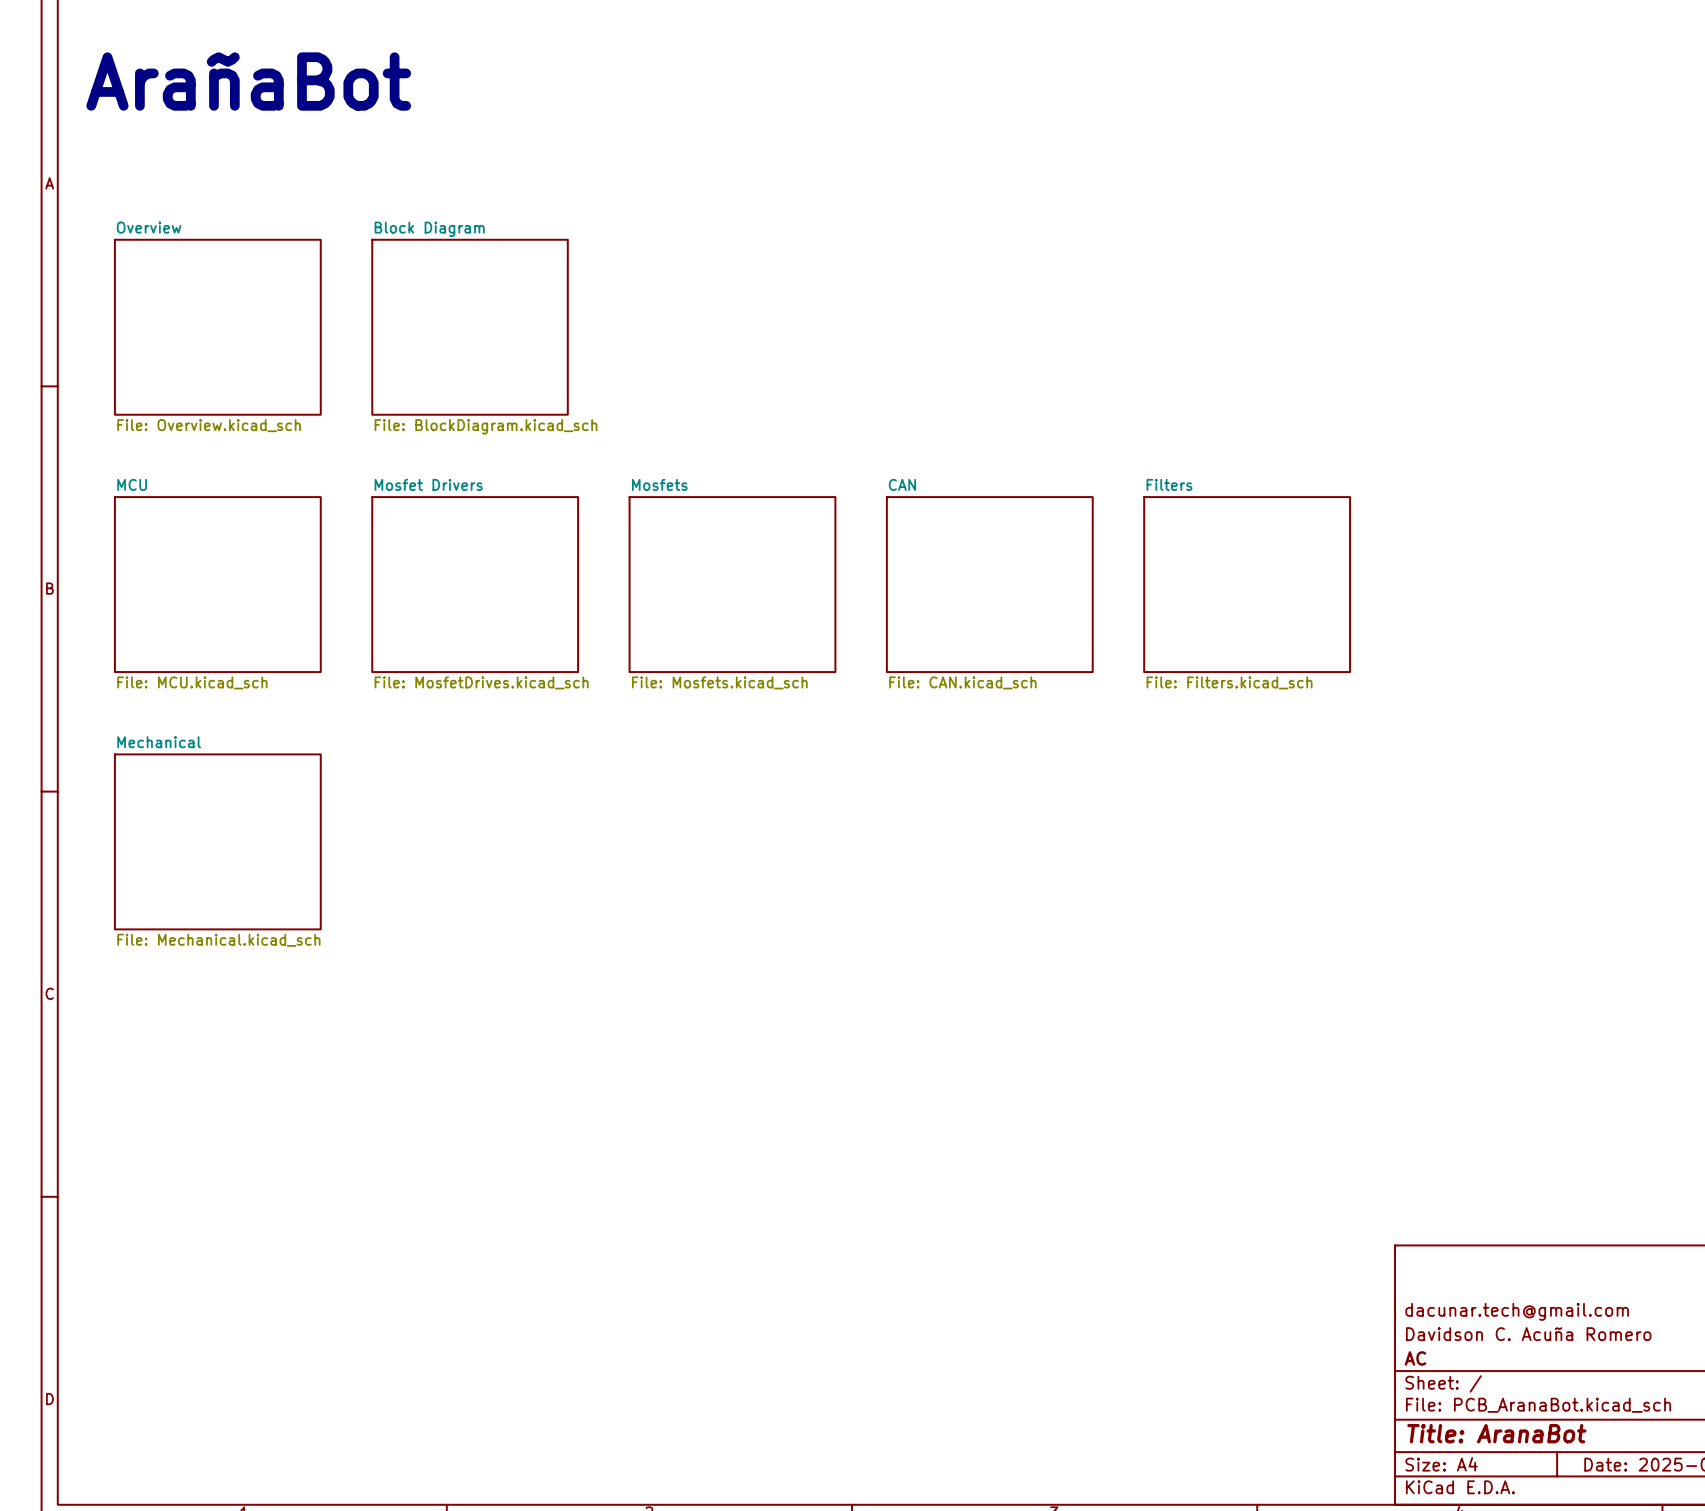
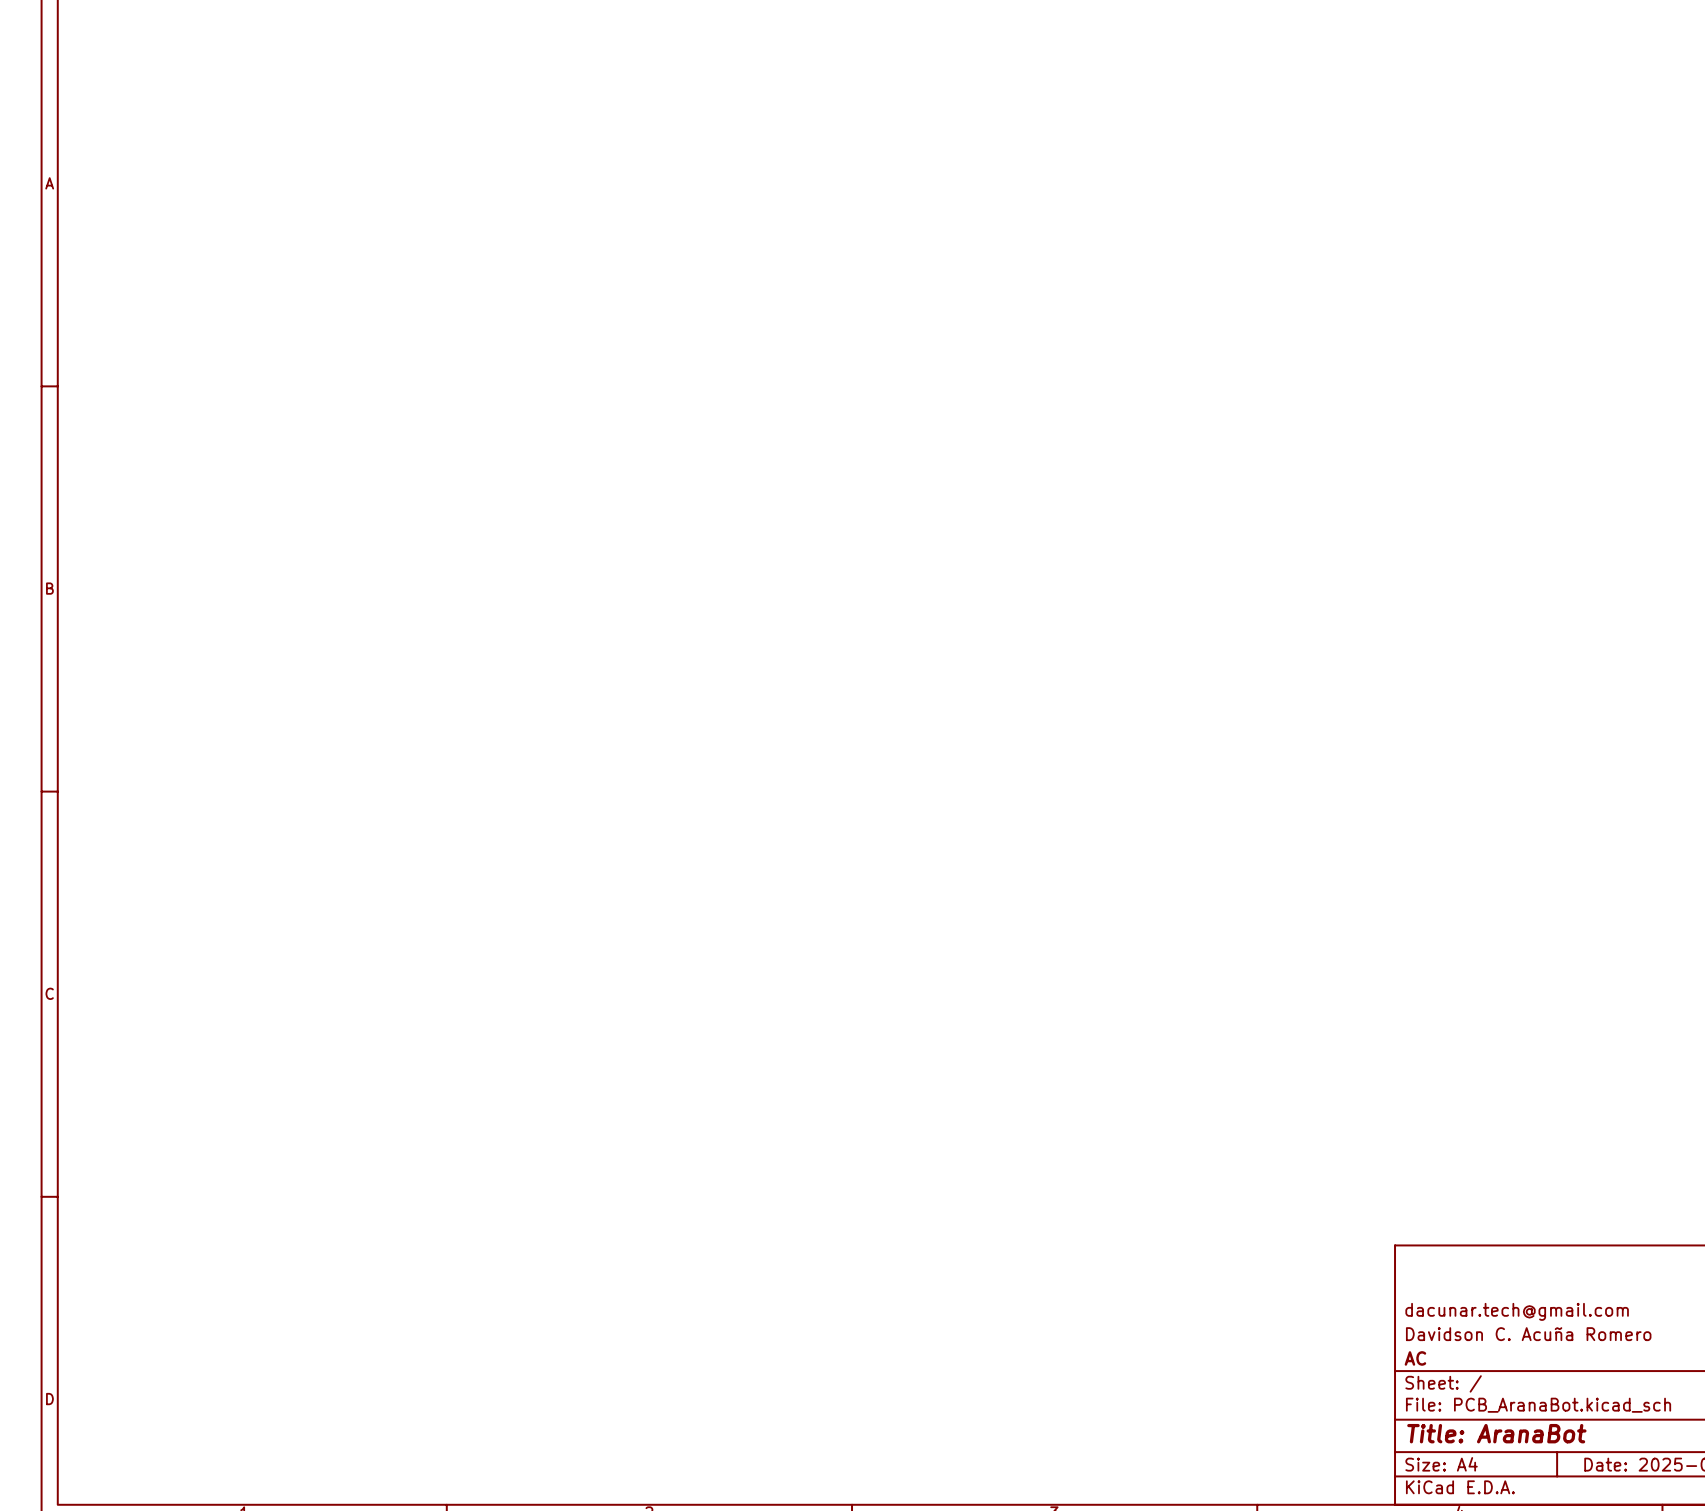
text: ArañaBot (248, 81) -> none
sheet Overview: File: Overview.kicad_sch (217, 327) -> none
sheet Block Diagram: File: BlockDiagram.kicad_sch (470, 327) -> none
sheet MCU: File: MCU.kicad_sch (217, 584) -> none
sheet Mosfet Drivers: File: MosfetDrives.kicad_sch (475, 584) -> none
sheet Mosfets: File: Mosfets.kicad_sch (732, 584) -> none
sheet CAN: File: CAN.kicad_sch (989, 584) -> none
sheet Filters: File: Filters.kicad_sch (1247, 584) -> none
sheet Mechanical: File: Mechanical.kicad_sch (217, 841) -> none

